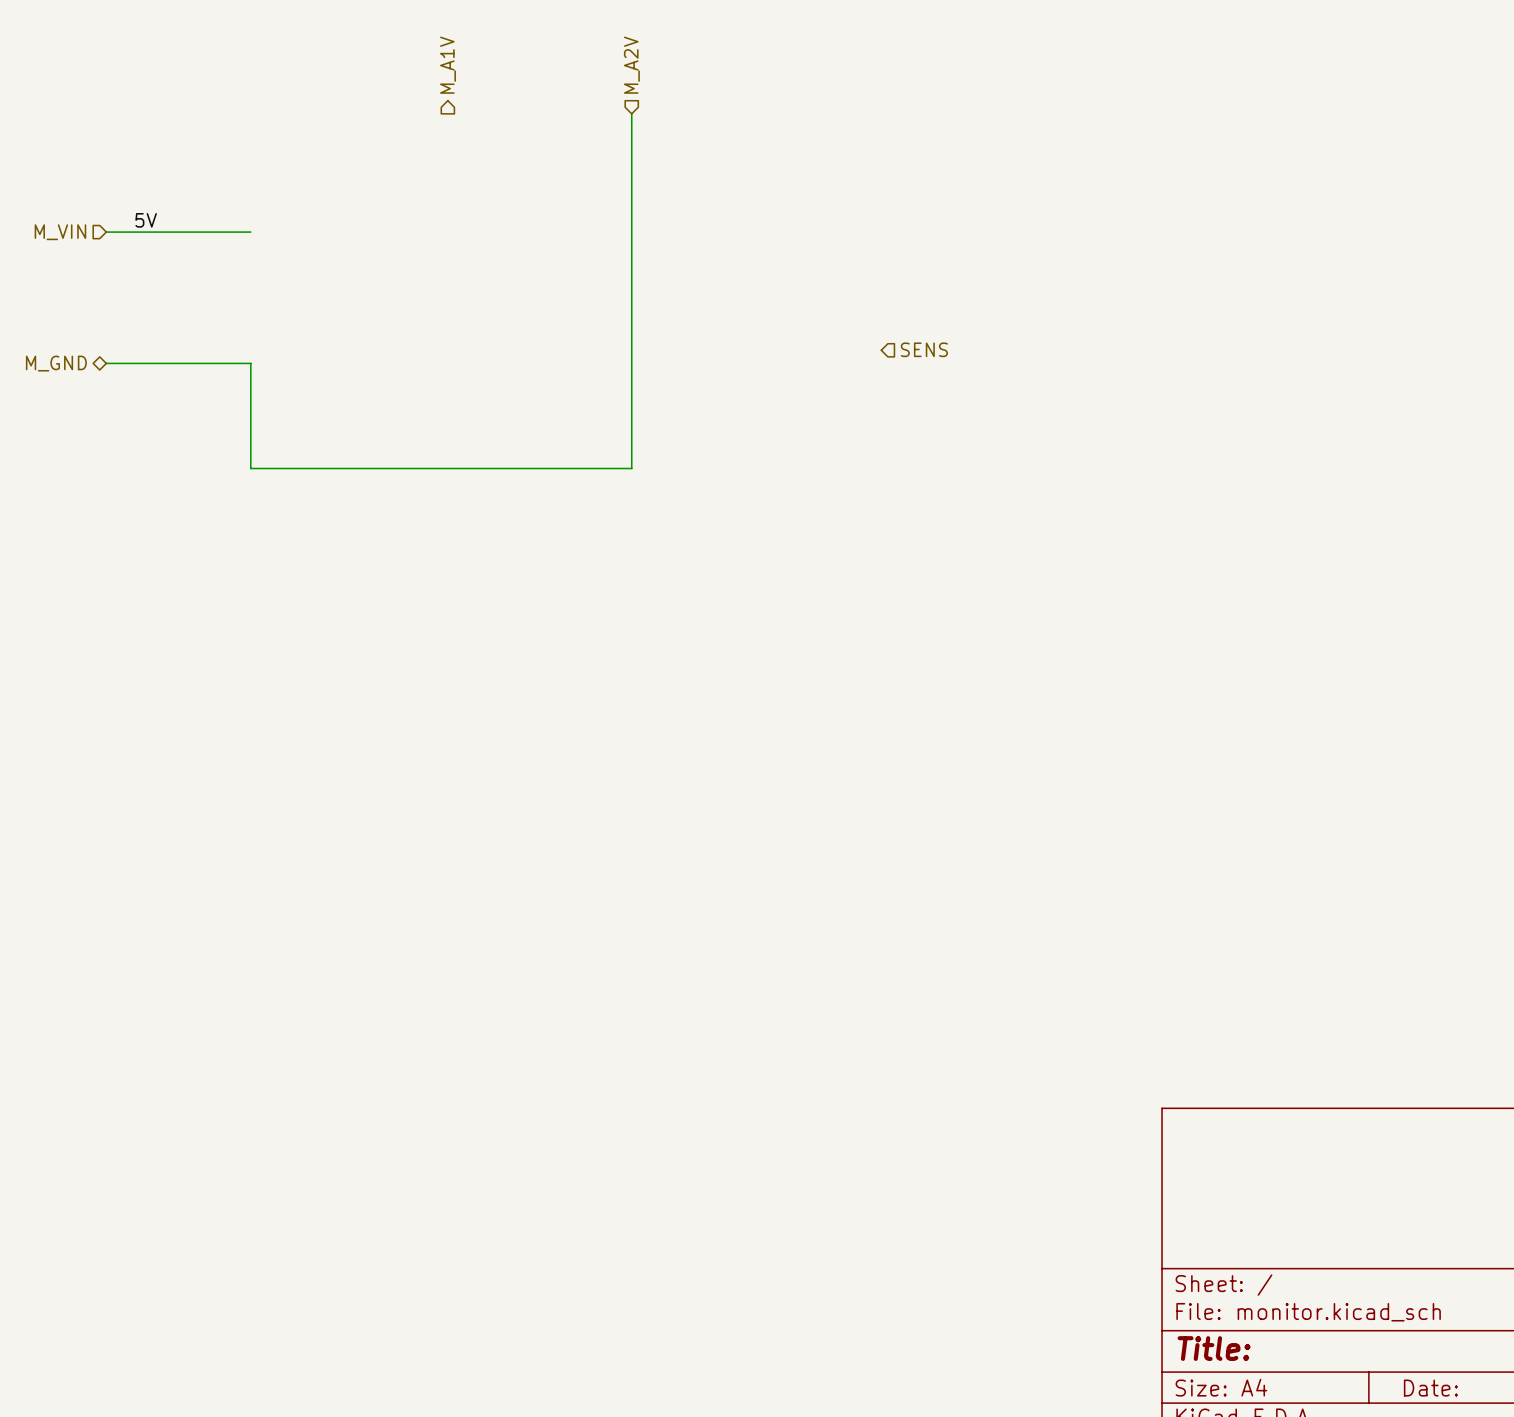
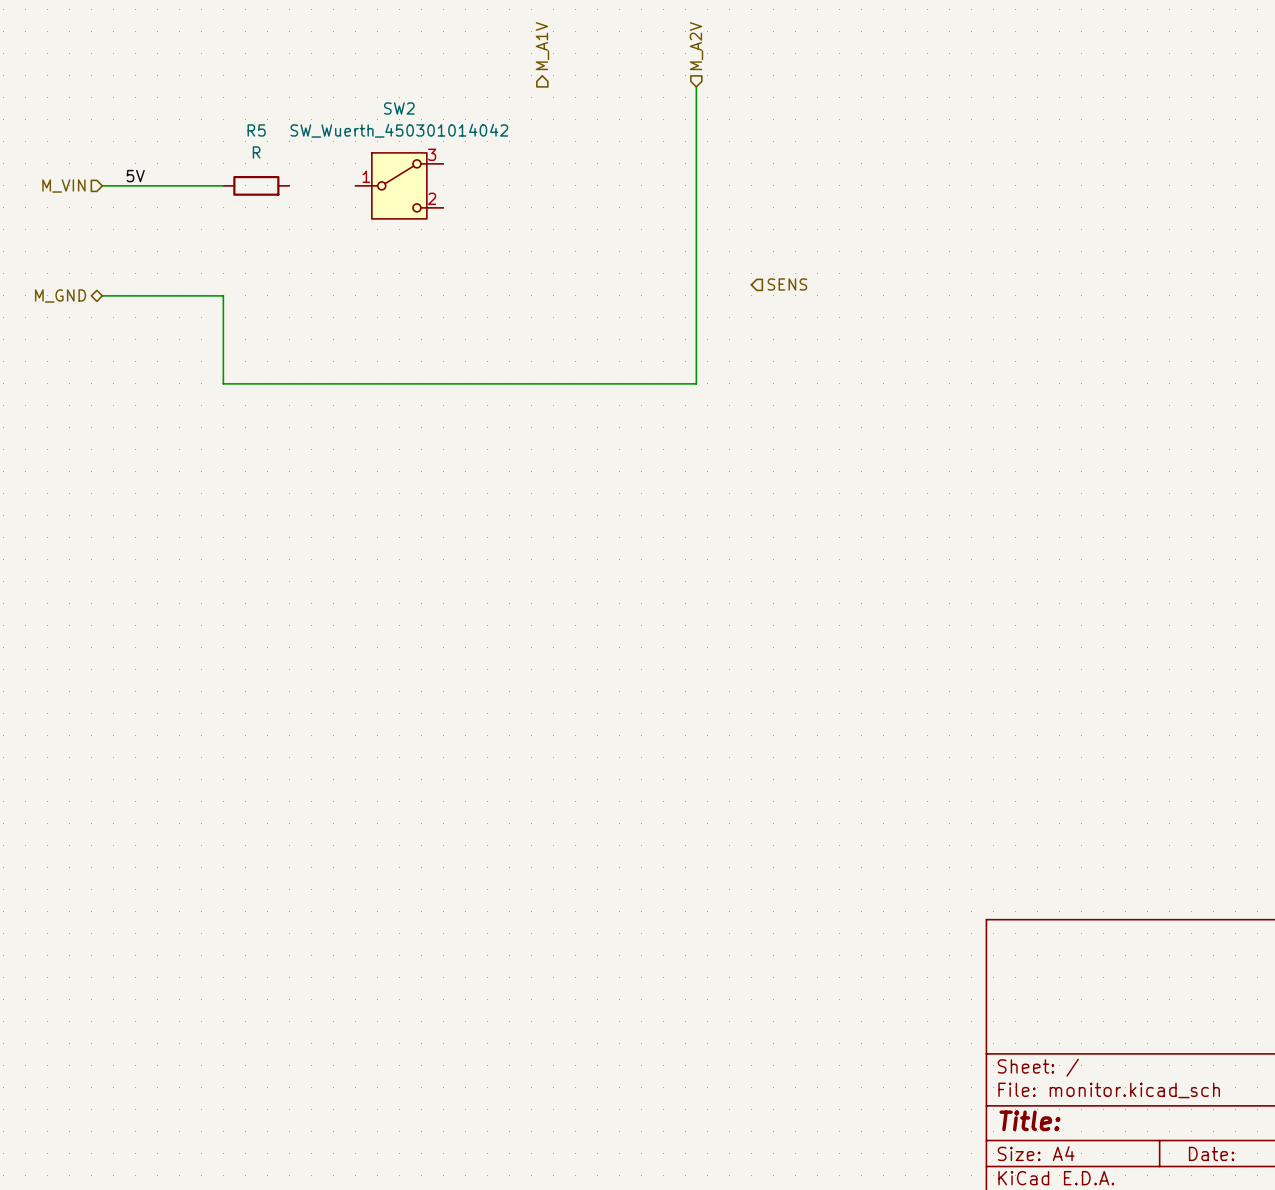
hierarchical label: M_A1V (447, 65) -> none
hierarchical label shape: input (631, 65) -> output (542, 46)
hierarchical label: M_A2V (631, 65) -> M_A1V (542, 46)
hierarchical label: none -> M_A2V (696, 46)
wire: (631, 113) (631, 468) -> (696, 86) (696, 383) (542, 383)
R5: none -> R (256, 185)
SW2: none -> SW_Wuerth_450301014042 (399, 185)

